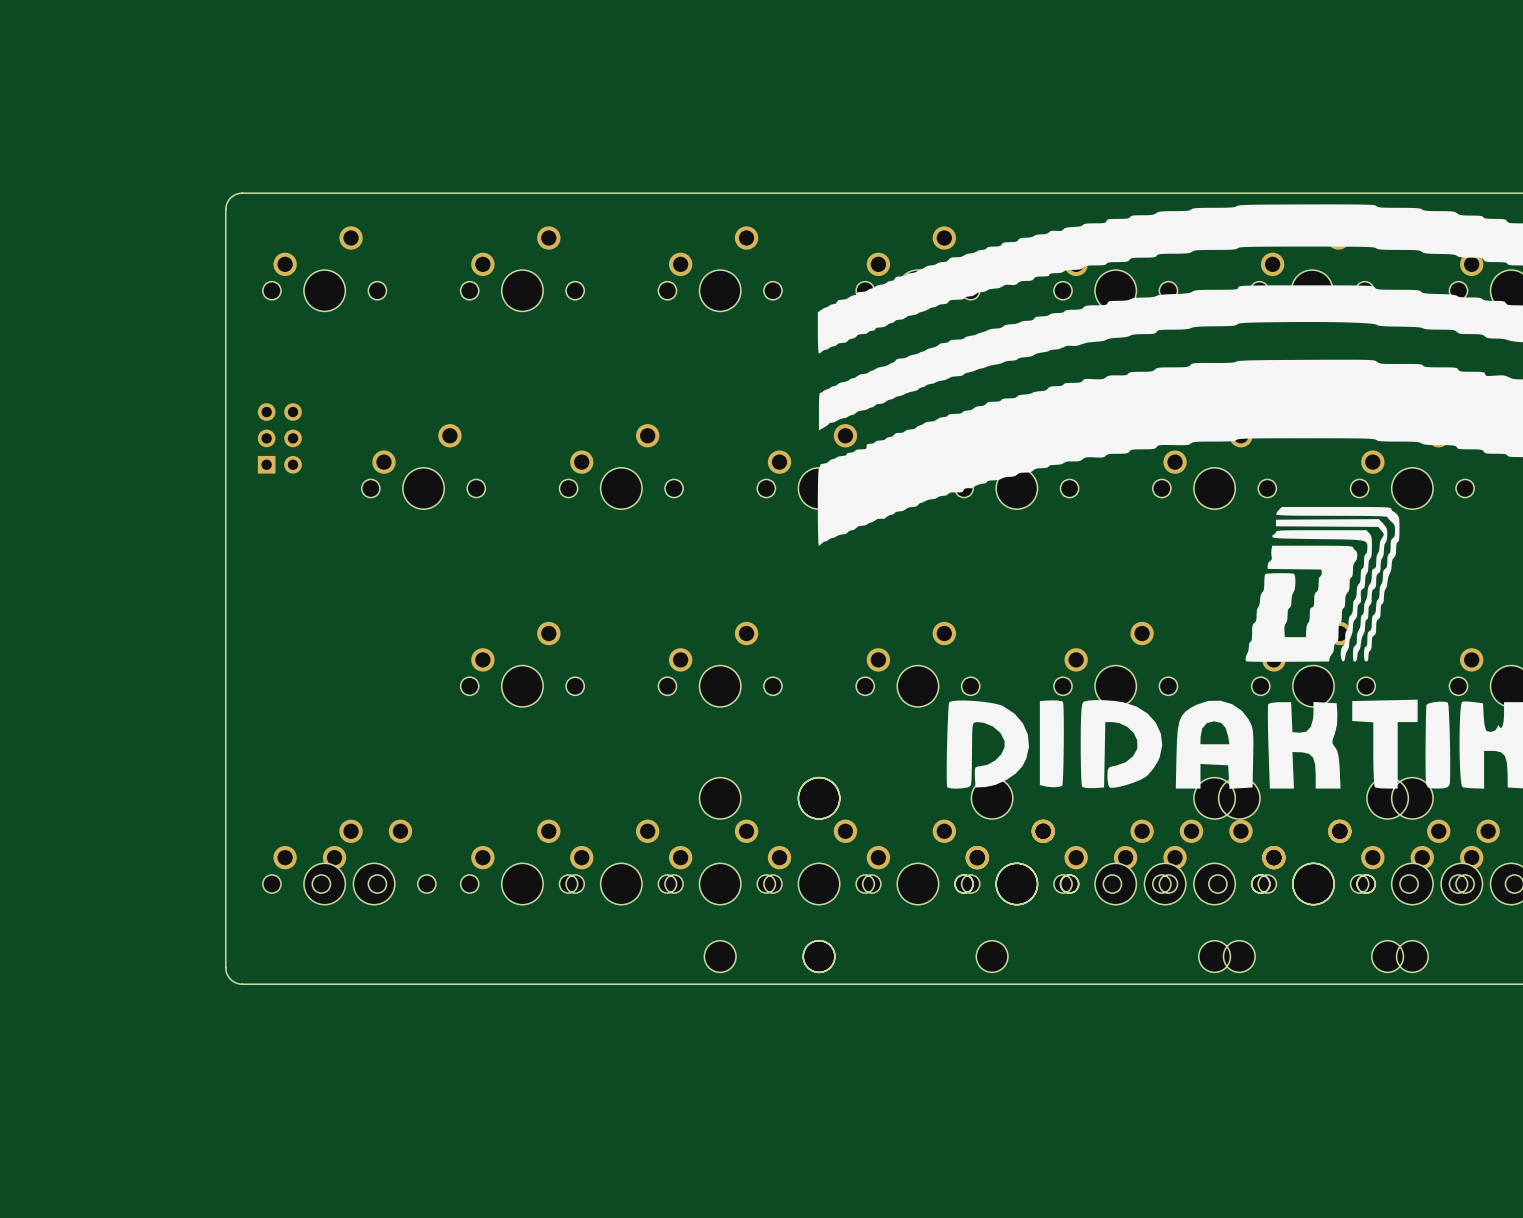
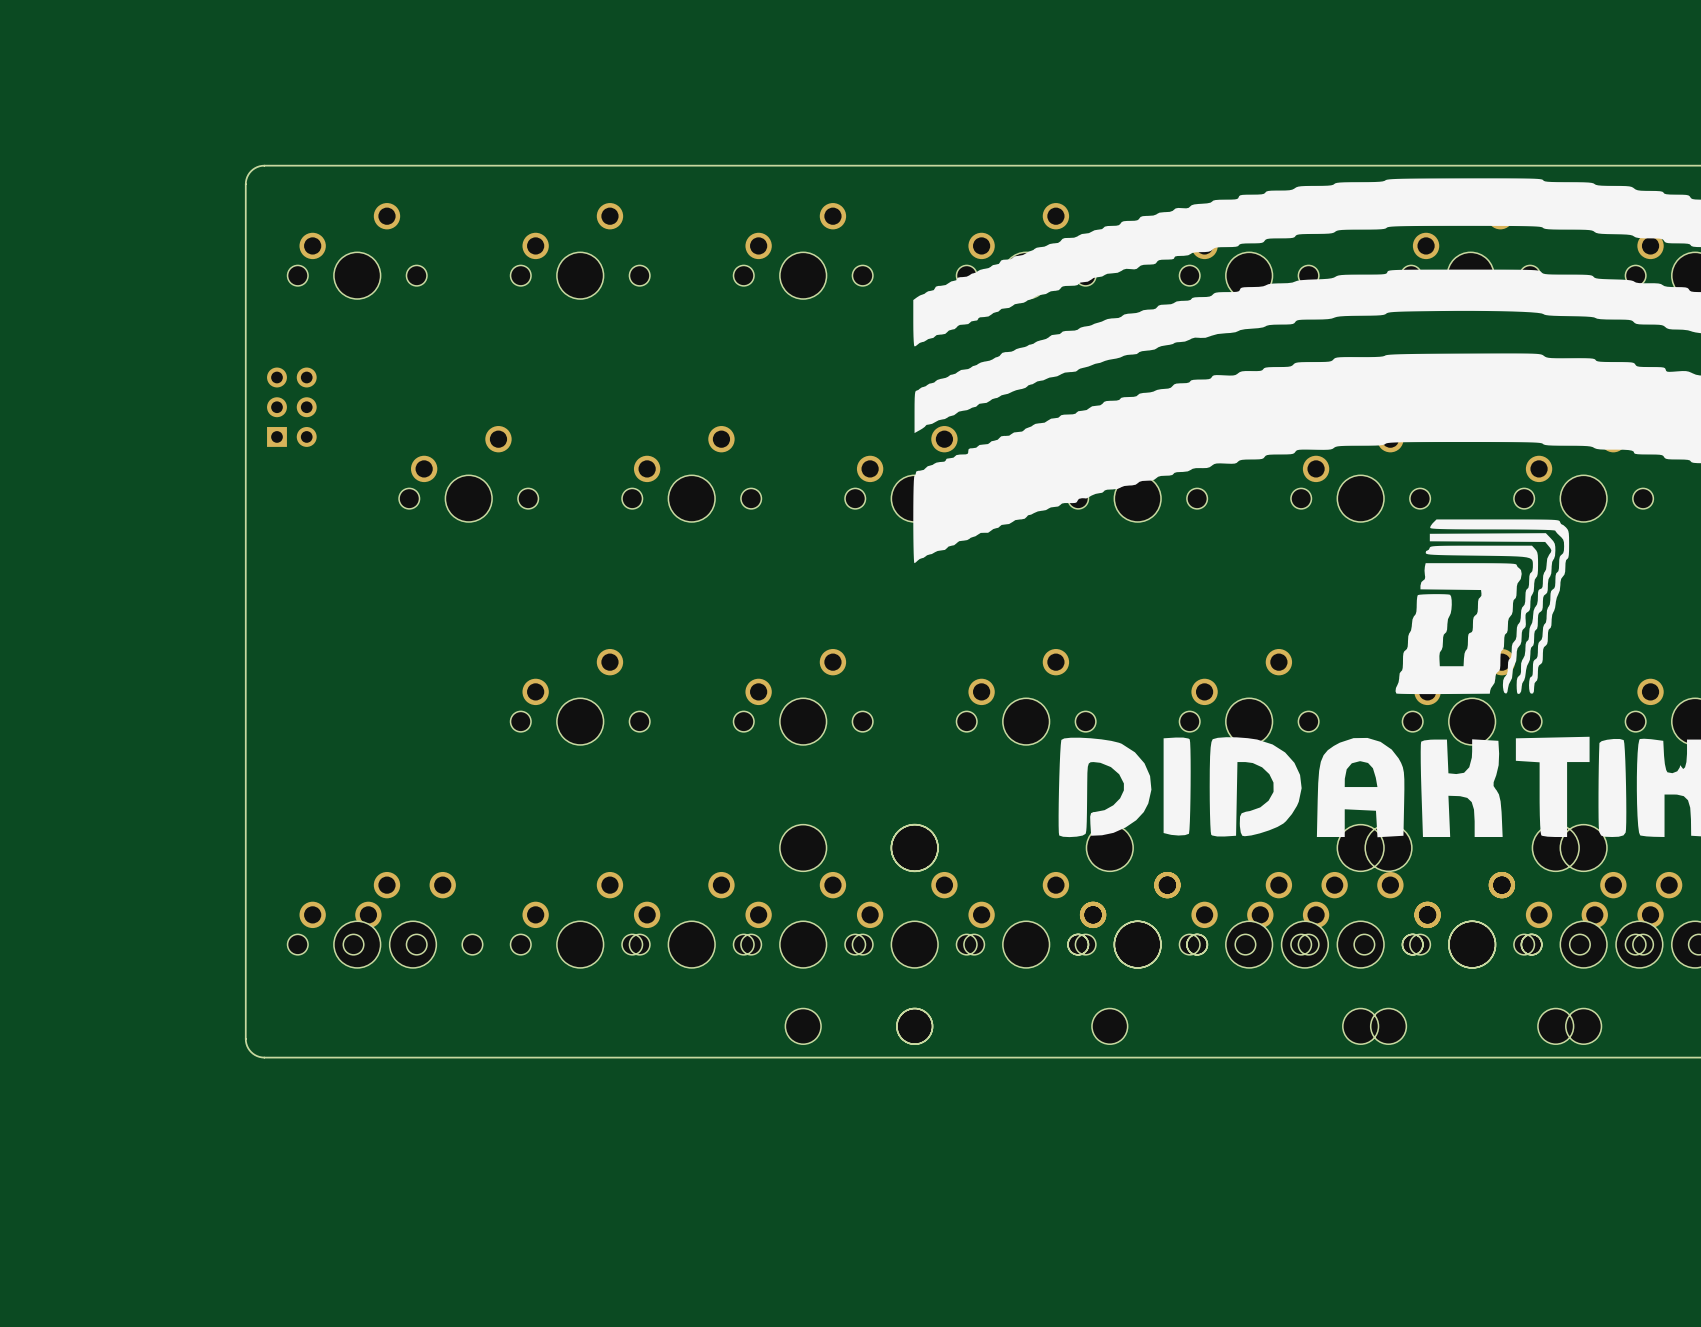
part position: (279, 438) -> (291, 407)

